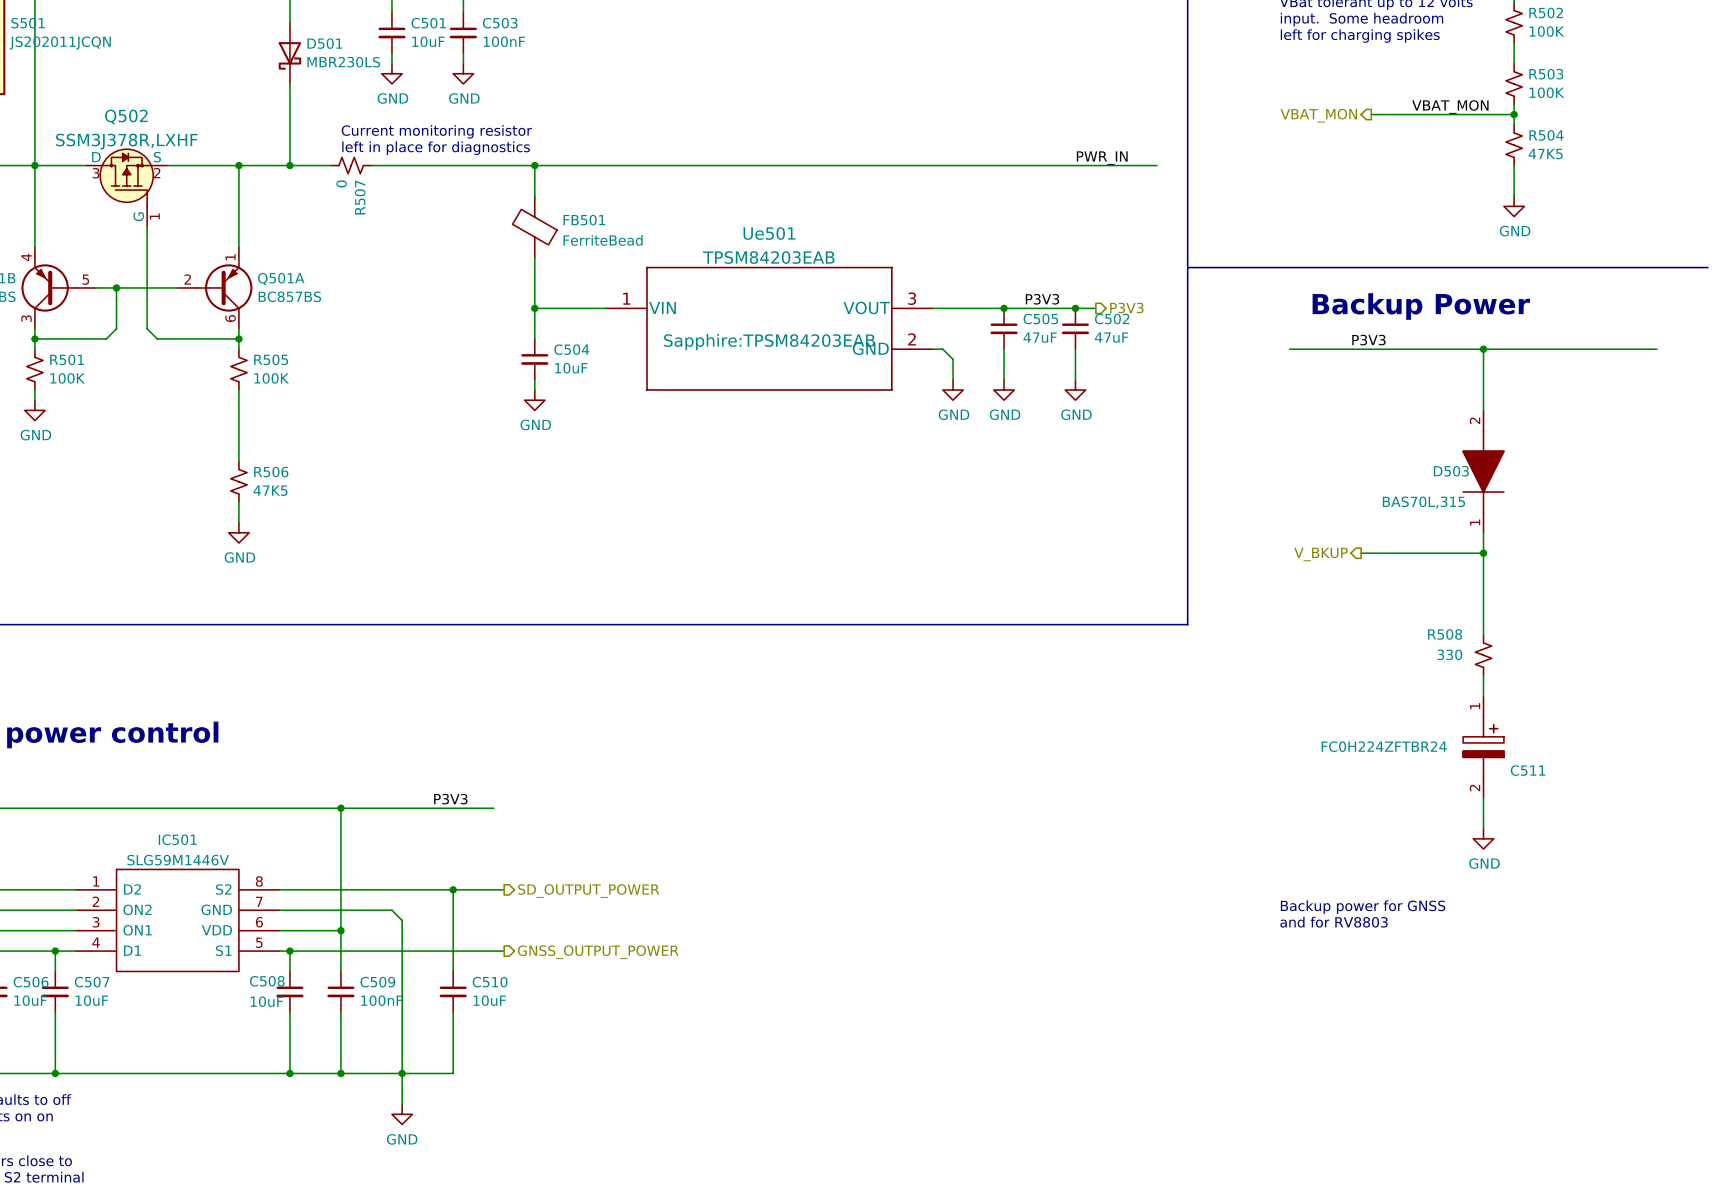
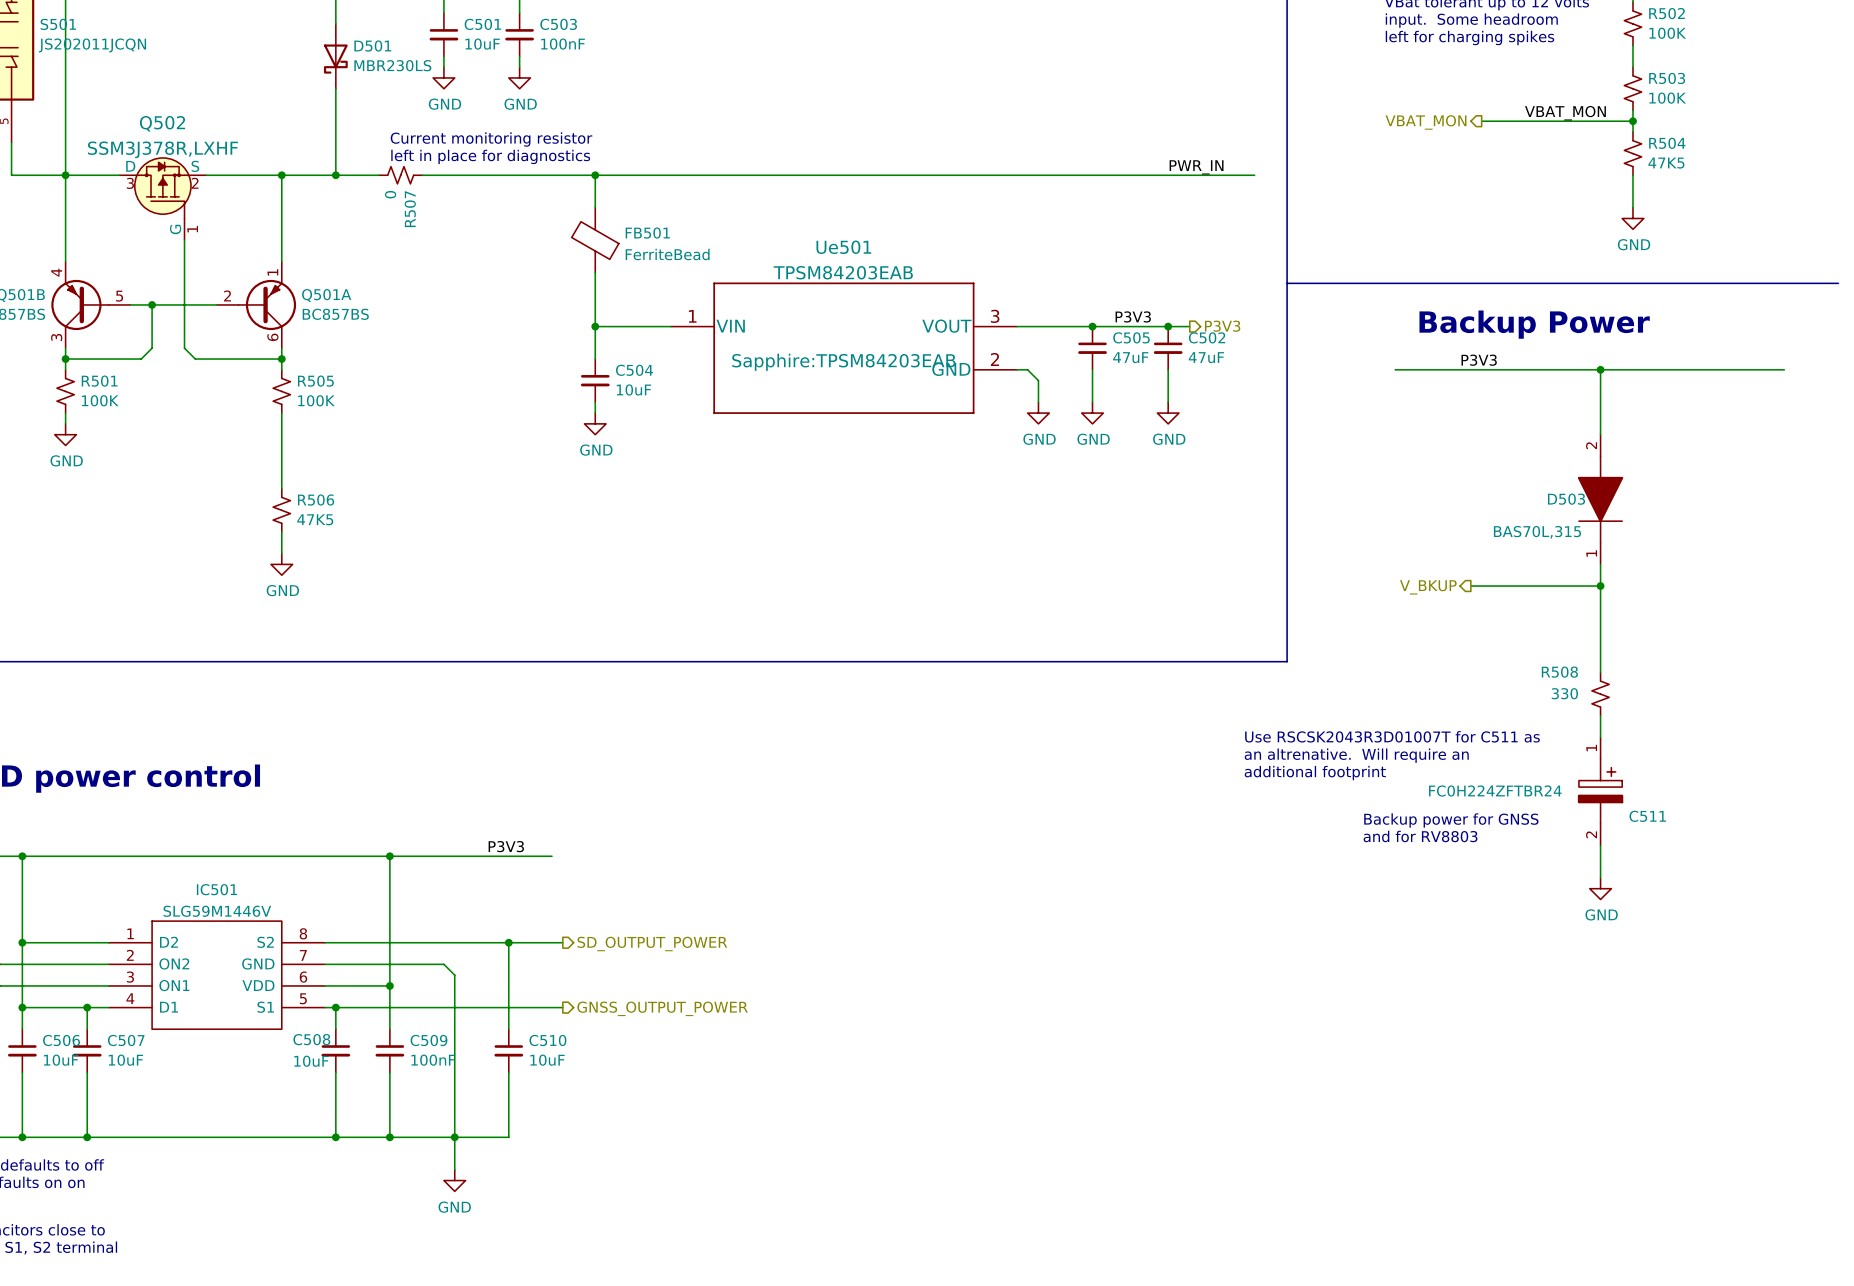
text: none -> Use RSCSK2043R3D01007T for C511 as (1392, 736)
text: none -> an altrenative. Will require an (1356, 755)
text: none -> additional footprint (1315, 773)
text position: Backup power for GNSS (1363, 907) -> Backup power for GNSS (1451, 820)
text position: and for RV8803 (1334, 922) -> and for RV8803 (1420, 836)

